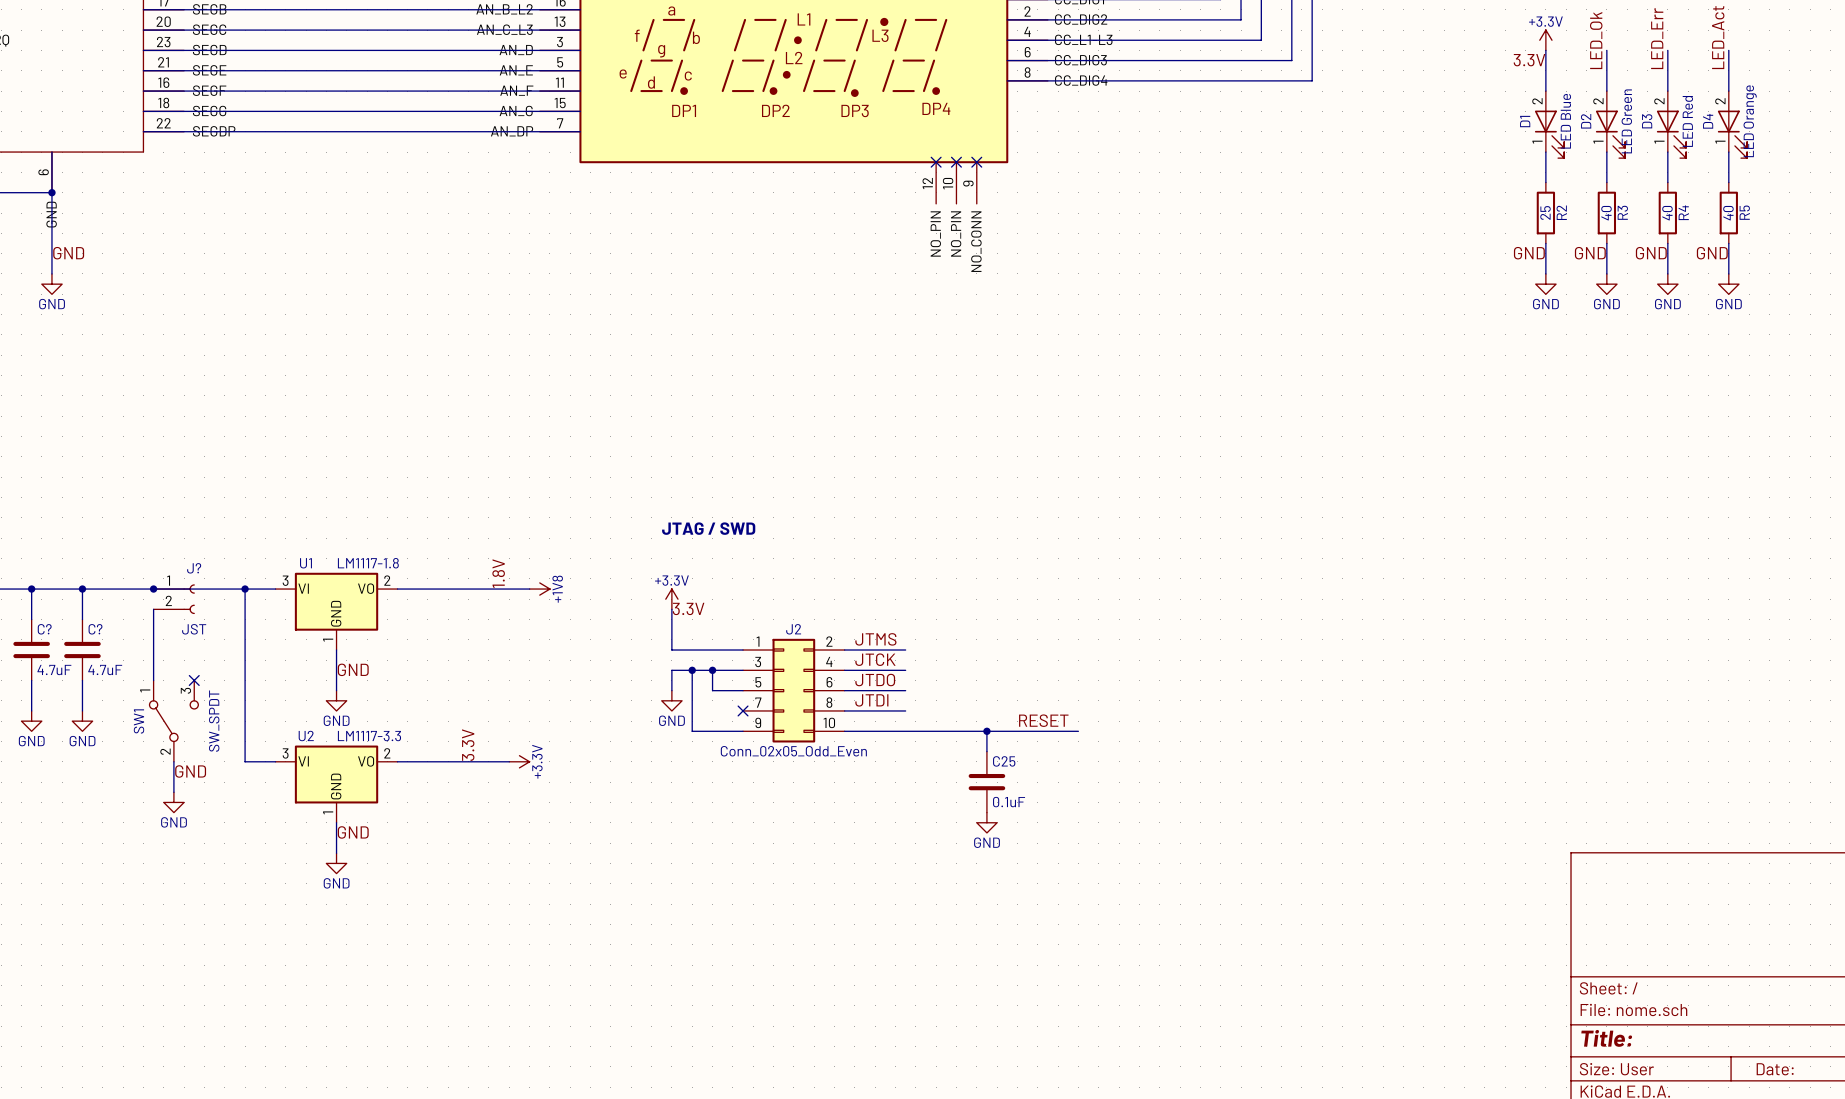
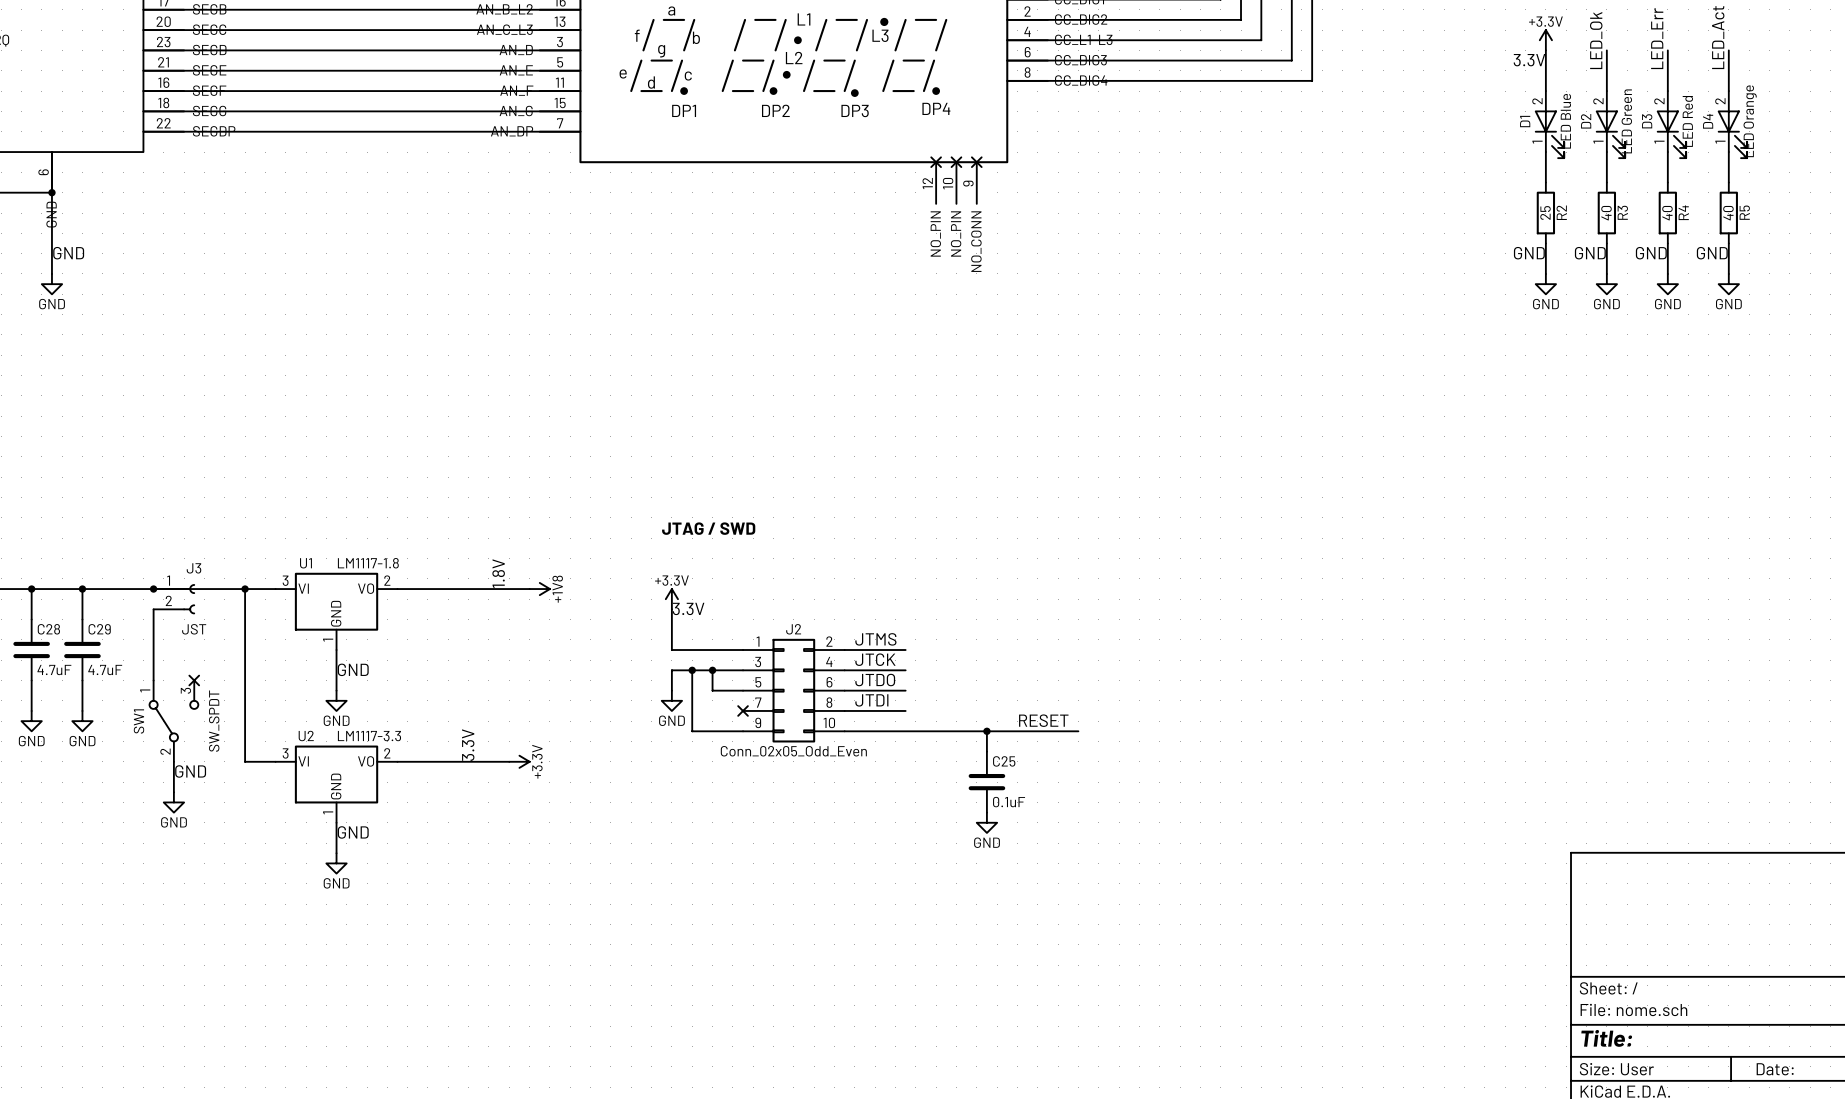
J? name: J? (194, 568) -> J3 (193, 568)
C? name: C? (44, 629) -> C28 (48, 629)
C? name: C? (95, 629) -> C29 (99, 629)

